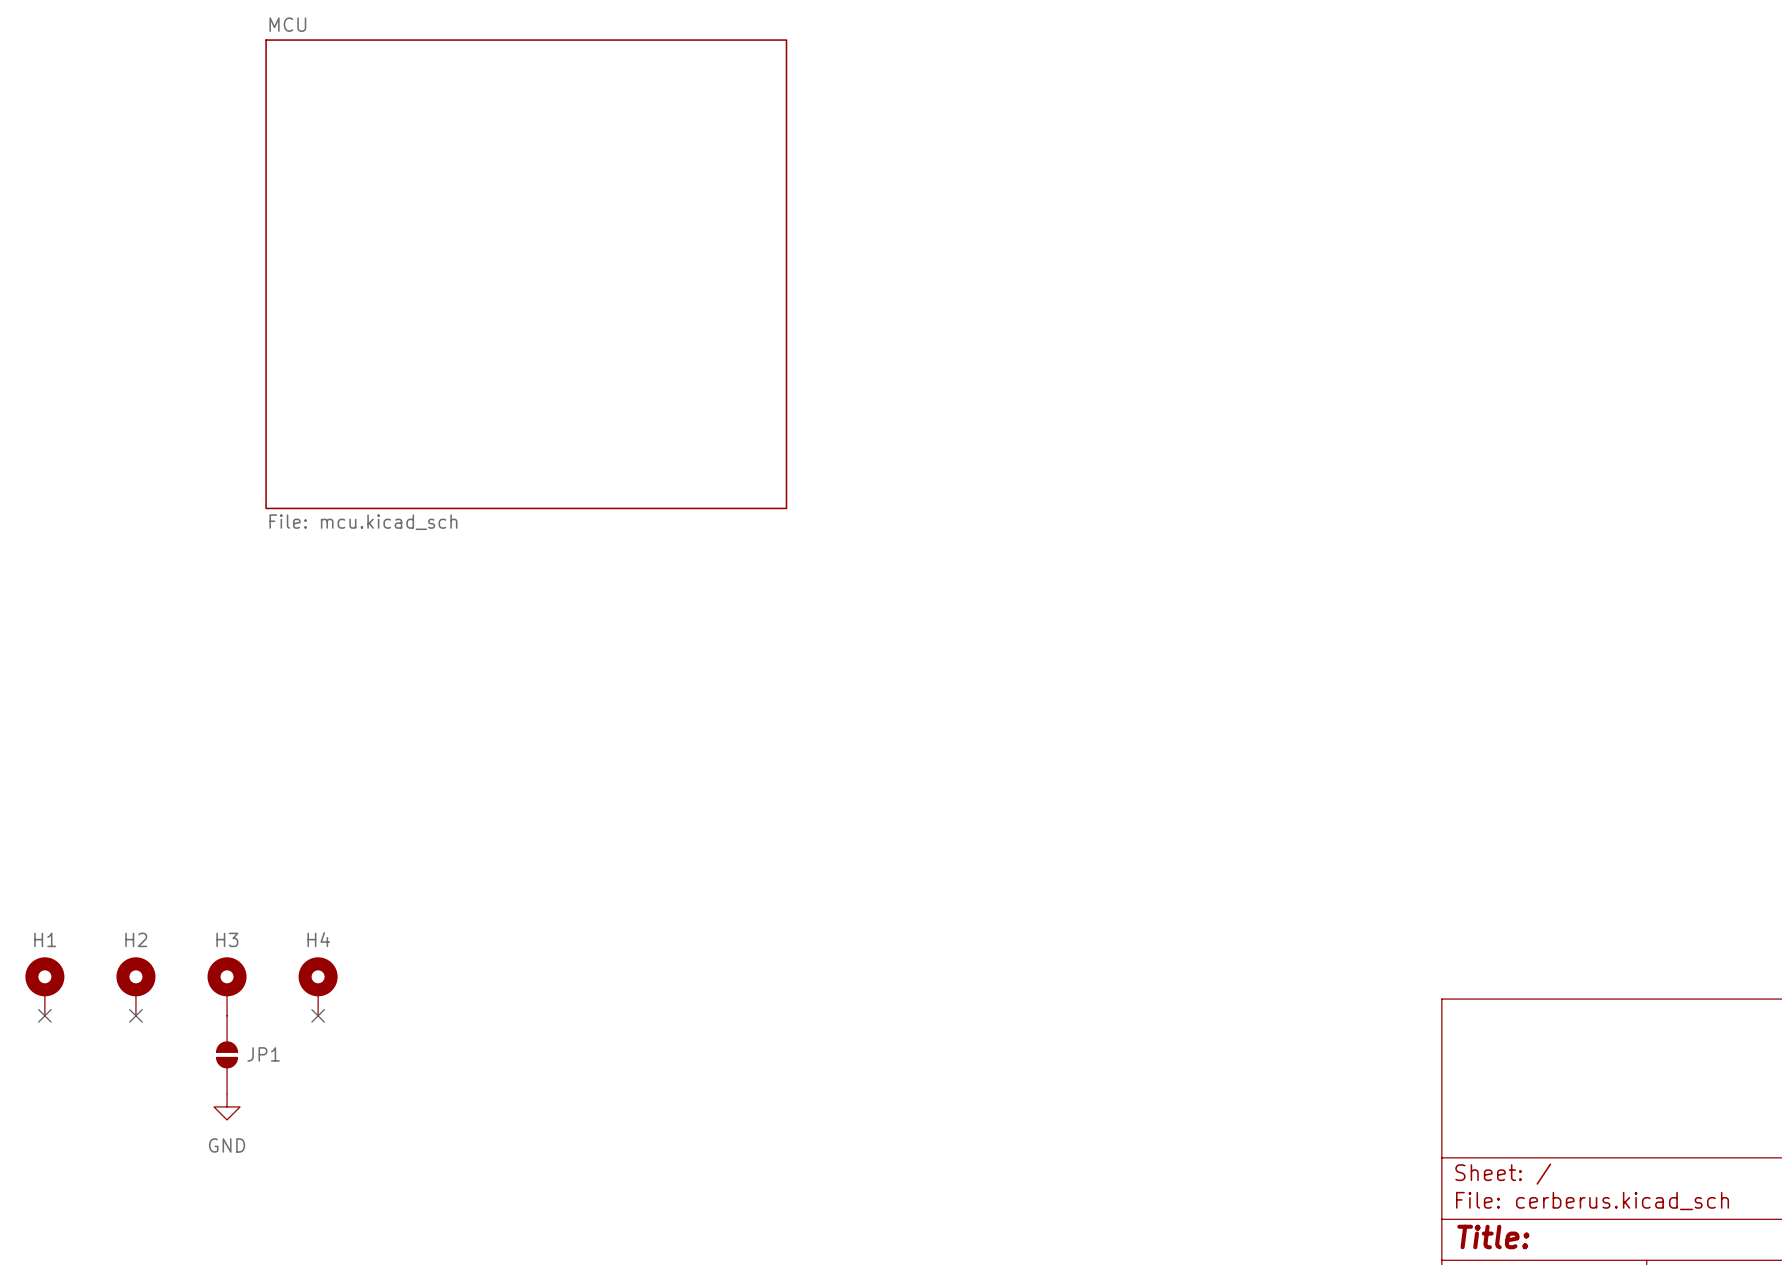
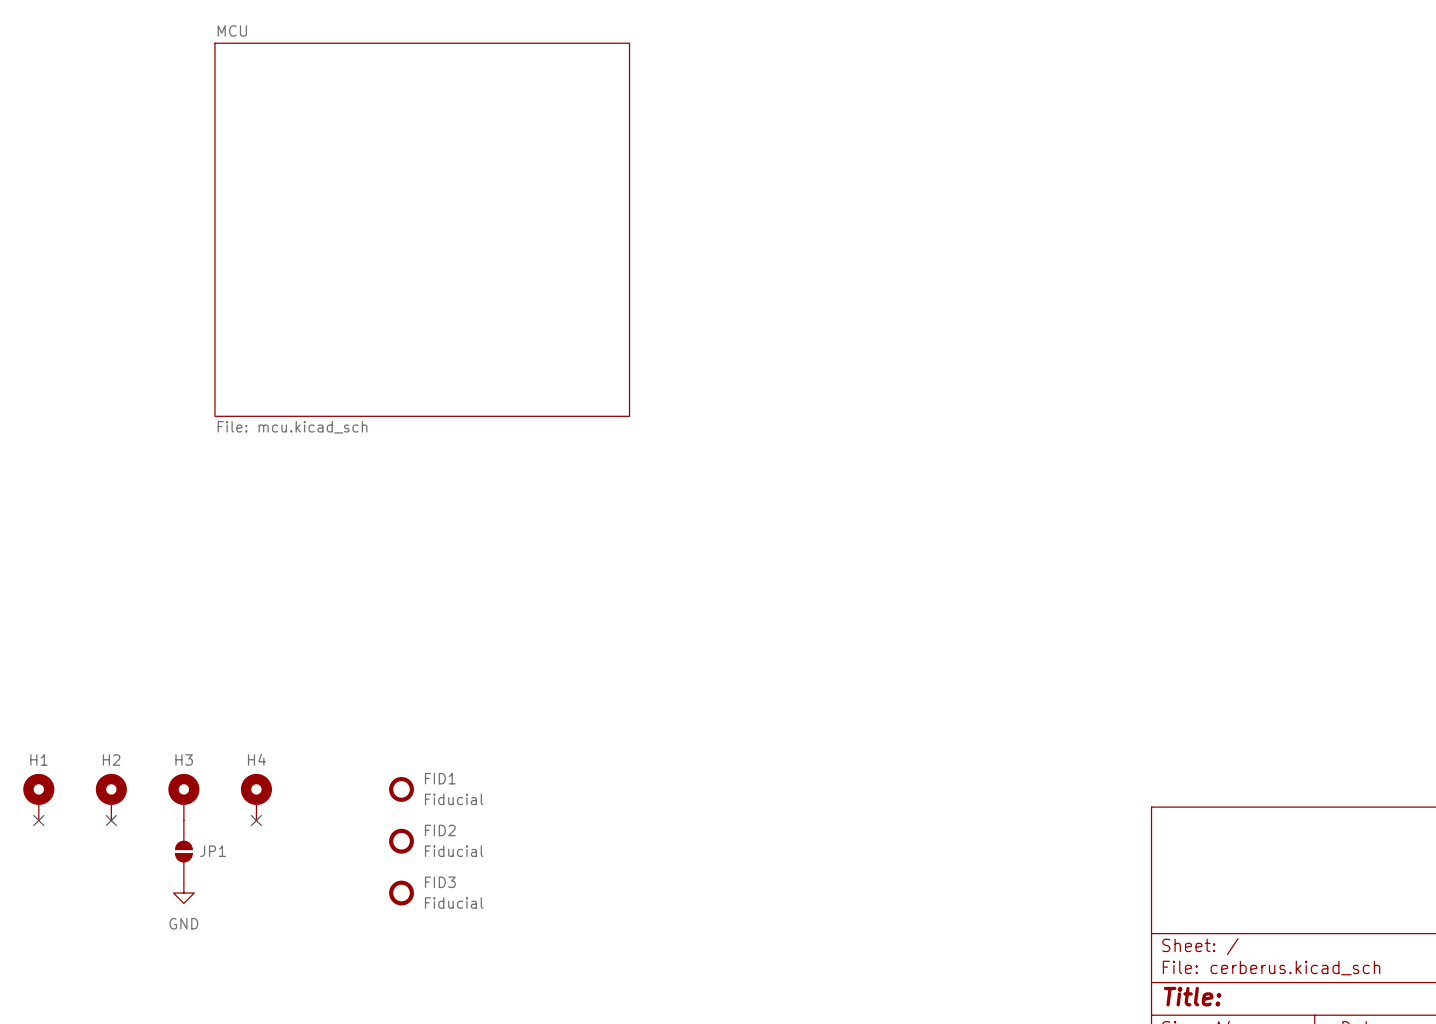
FID1: none -> Fiducial (401, 789)
FID2: none -> Fiducial (401, 841)
FID3: none -> Fiducial (401, 893)

